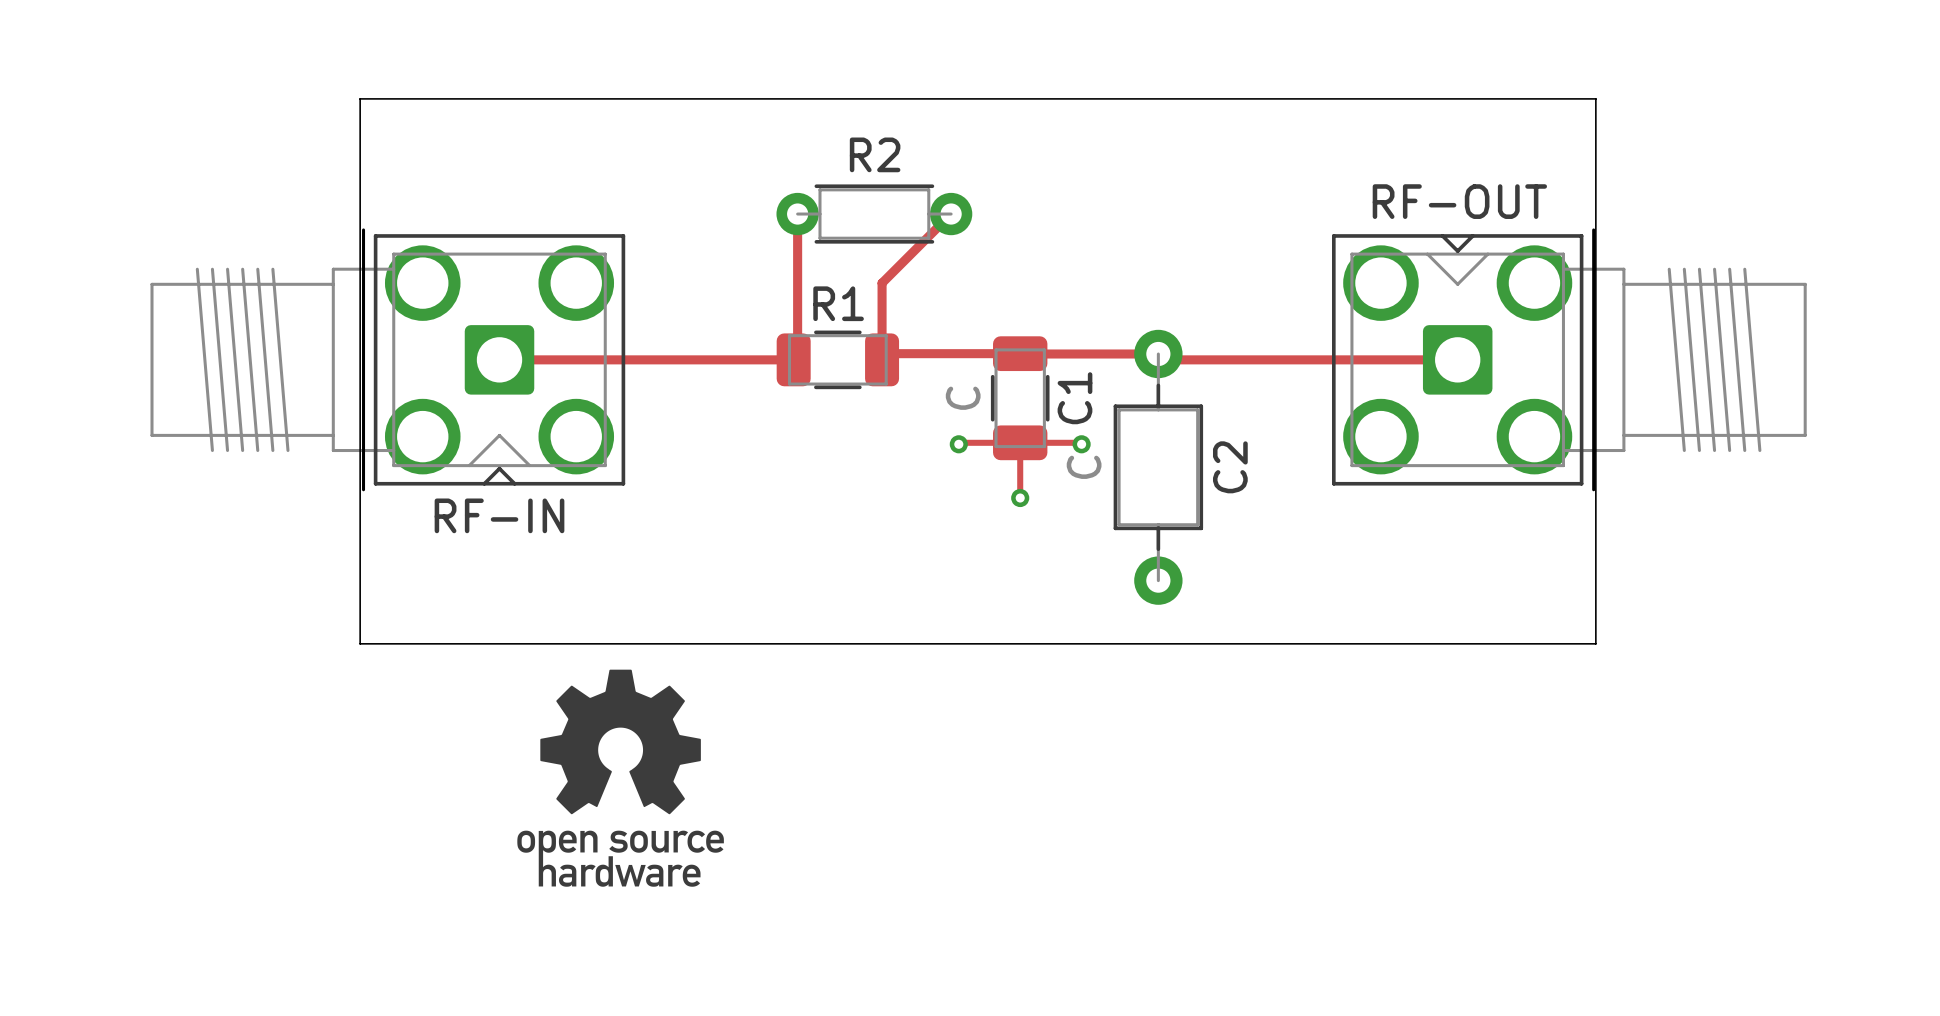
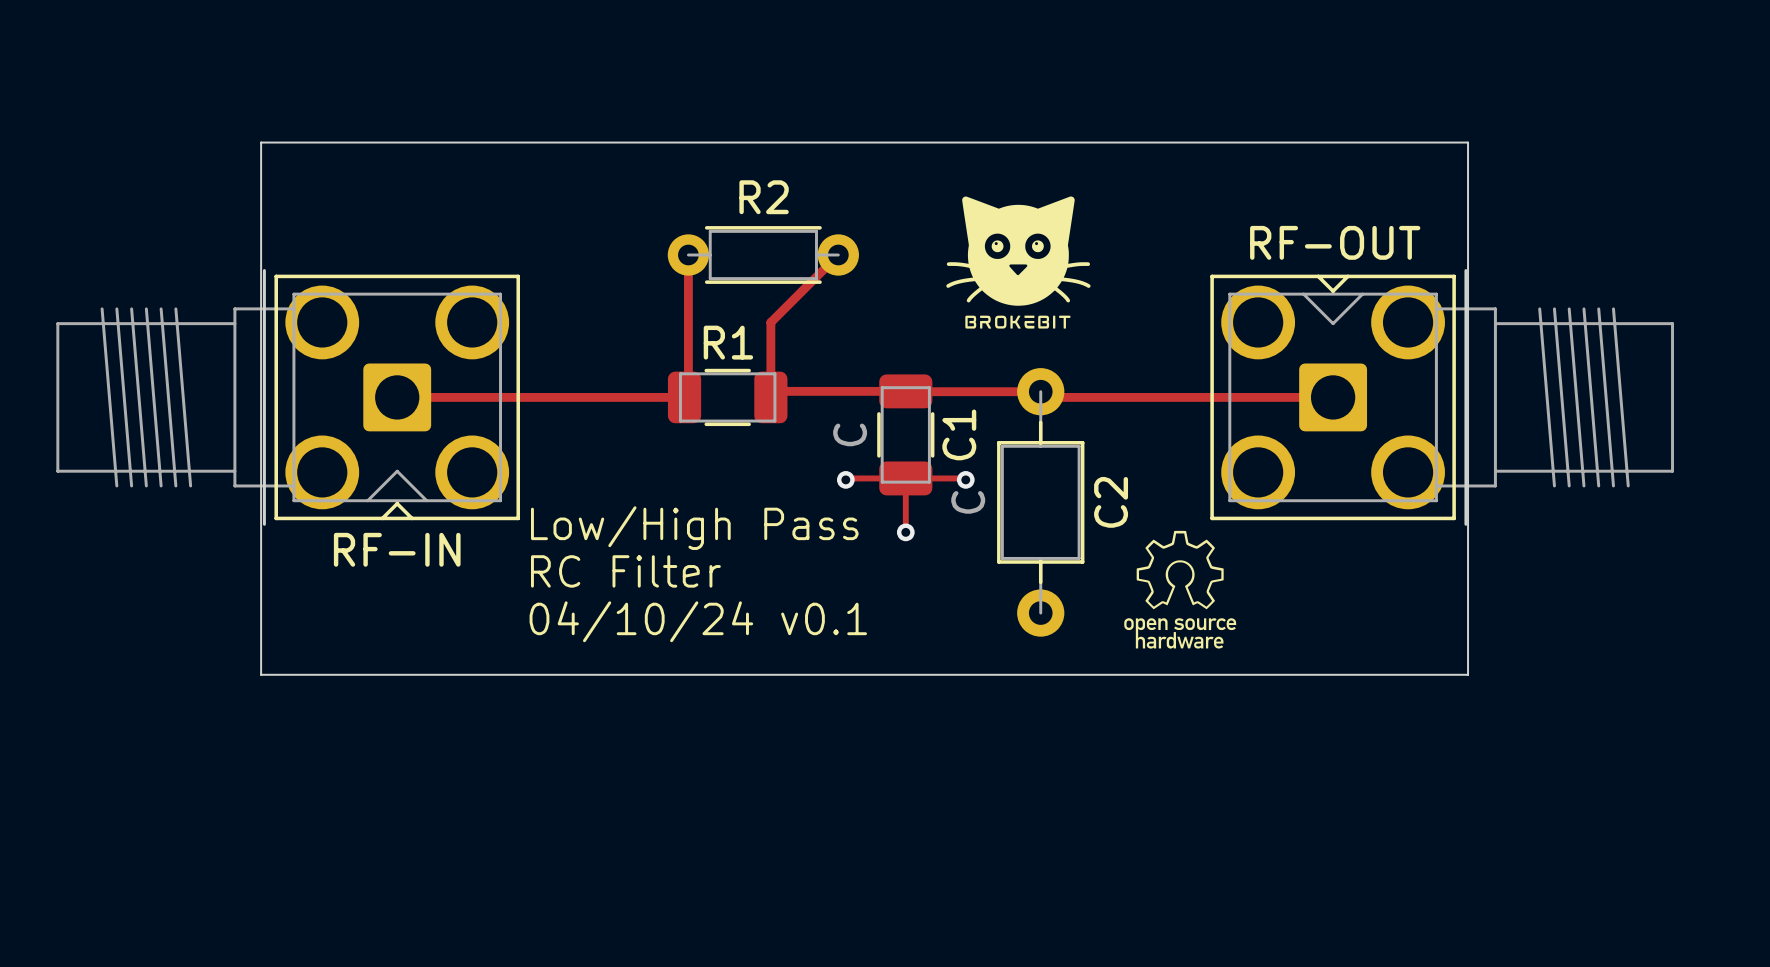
drawing: none -> [946, 196, 1091, 329]
text: none -> Low/High Pass (694, 528)
drawing: none -> [1124, 530, 1237, 649]
text: none -> RC Filter (625, 571)
text: none -> 04/10/24 v0.1 (698, 621)
drawing: [517, 669, 724, 887] -> none

